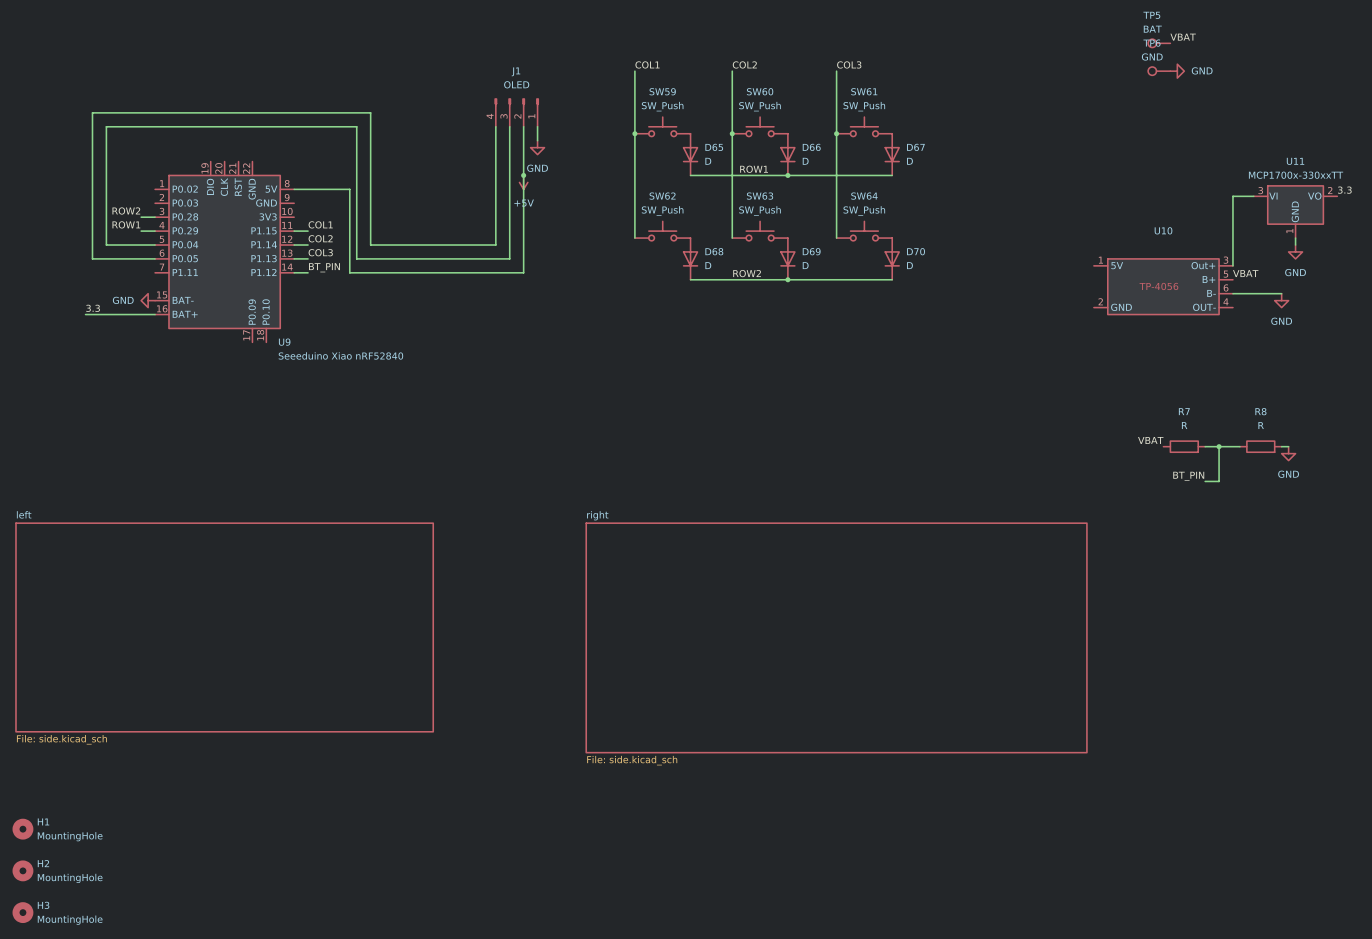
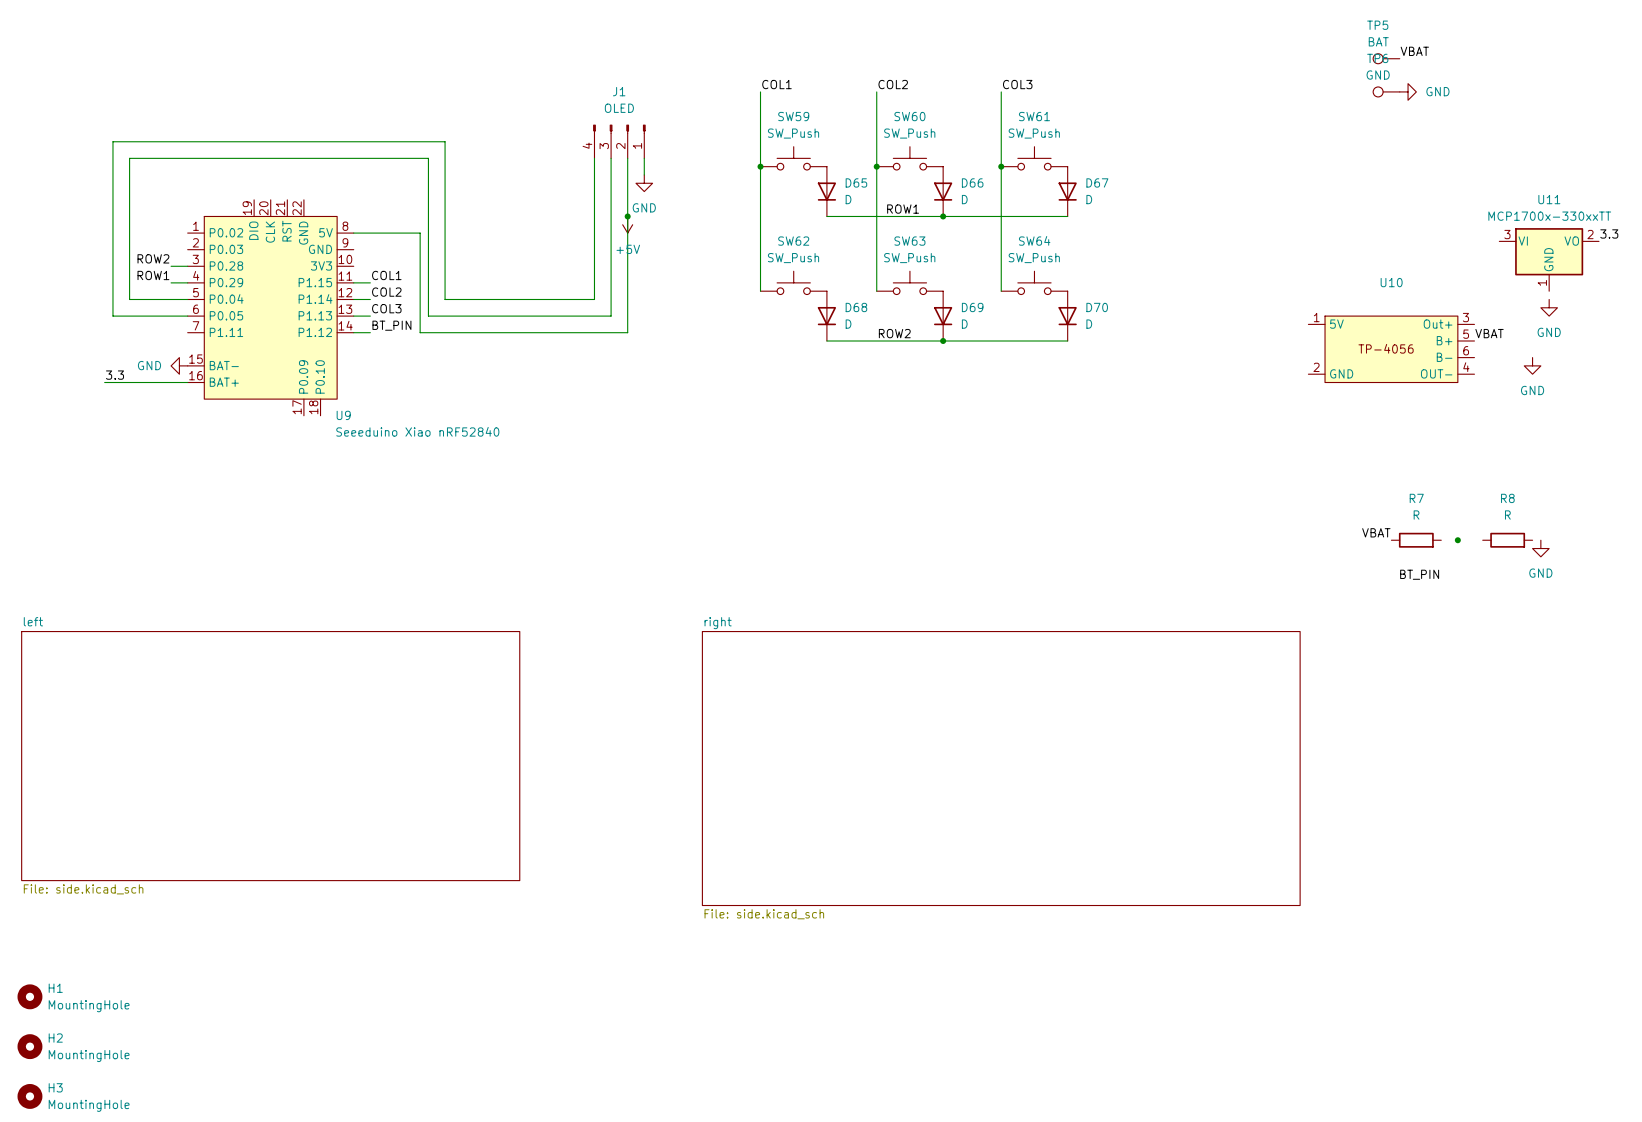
wire: (1253, 196) (1232, 196) (1232, 265) -> none
wire: (1295, 238) (1295, 245) -> none
wire: (1232, 293) (1281, 293) -> none
wire: (1205, 446) (1239, 446) -> none
wire: (1219, 446) (1219, 481) (1205, 481) -> none
wire: (1281, 446) (1288, 446) -> none

